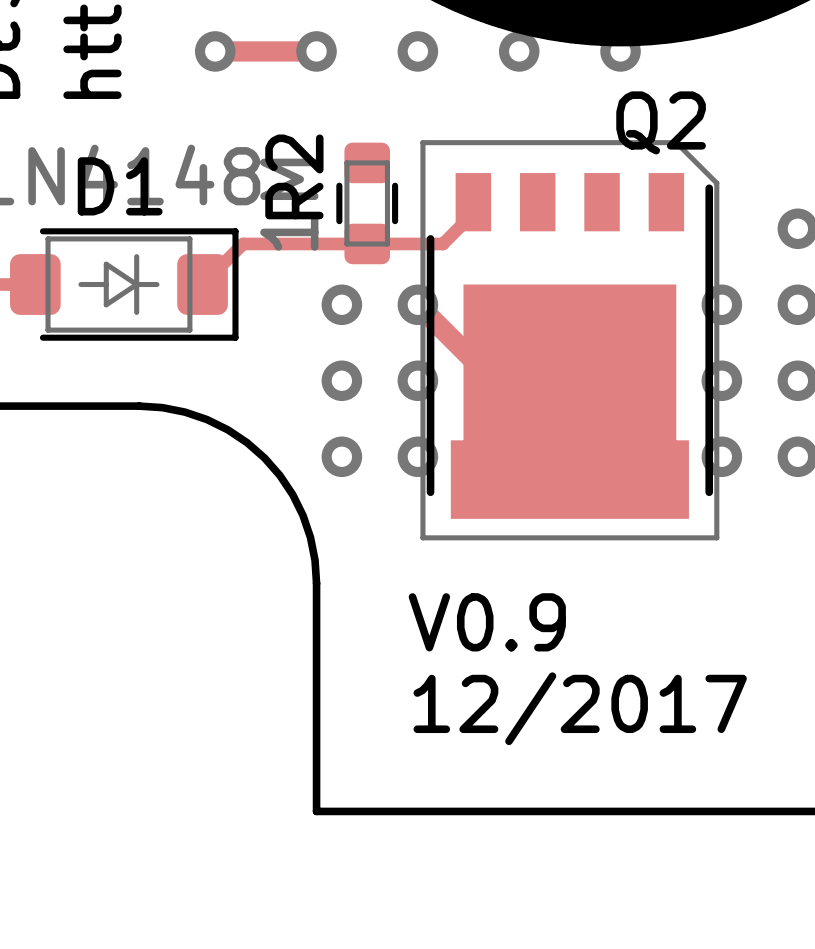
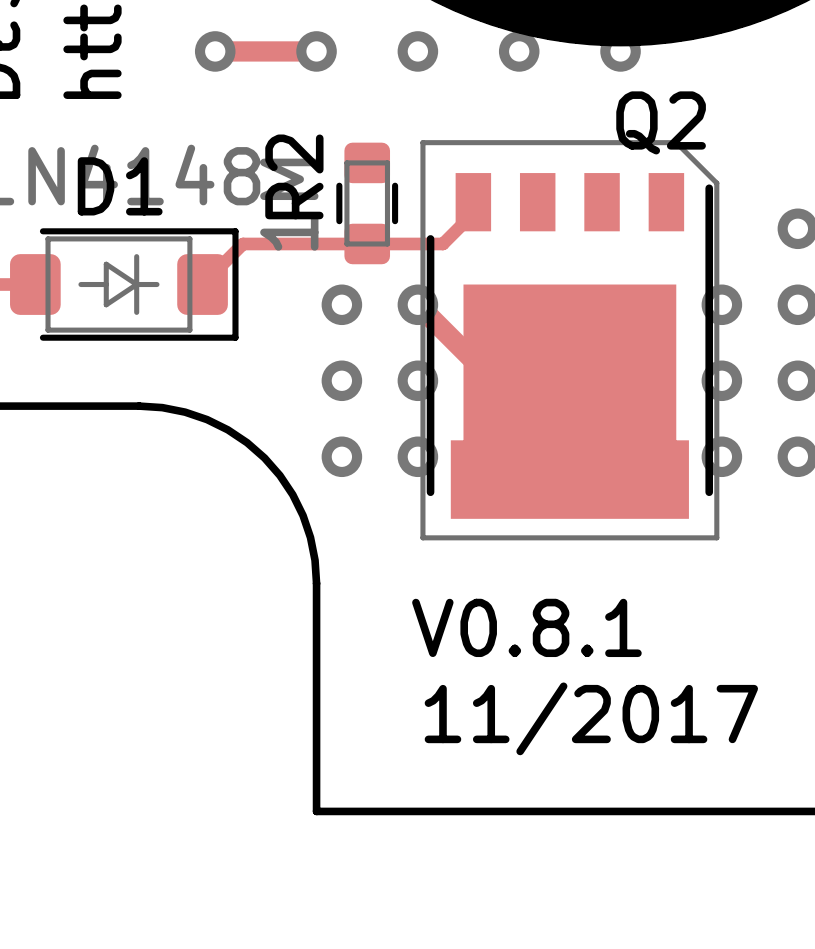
text: V0.9 (487, 622) -> none
text: none -> V0.8.1 (526, 627)
text: 12/2017 (580, 708) -> 11/2017 (591, 718)

